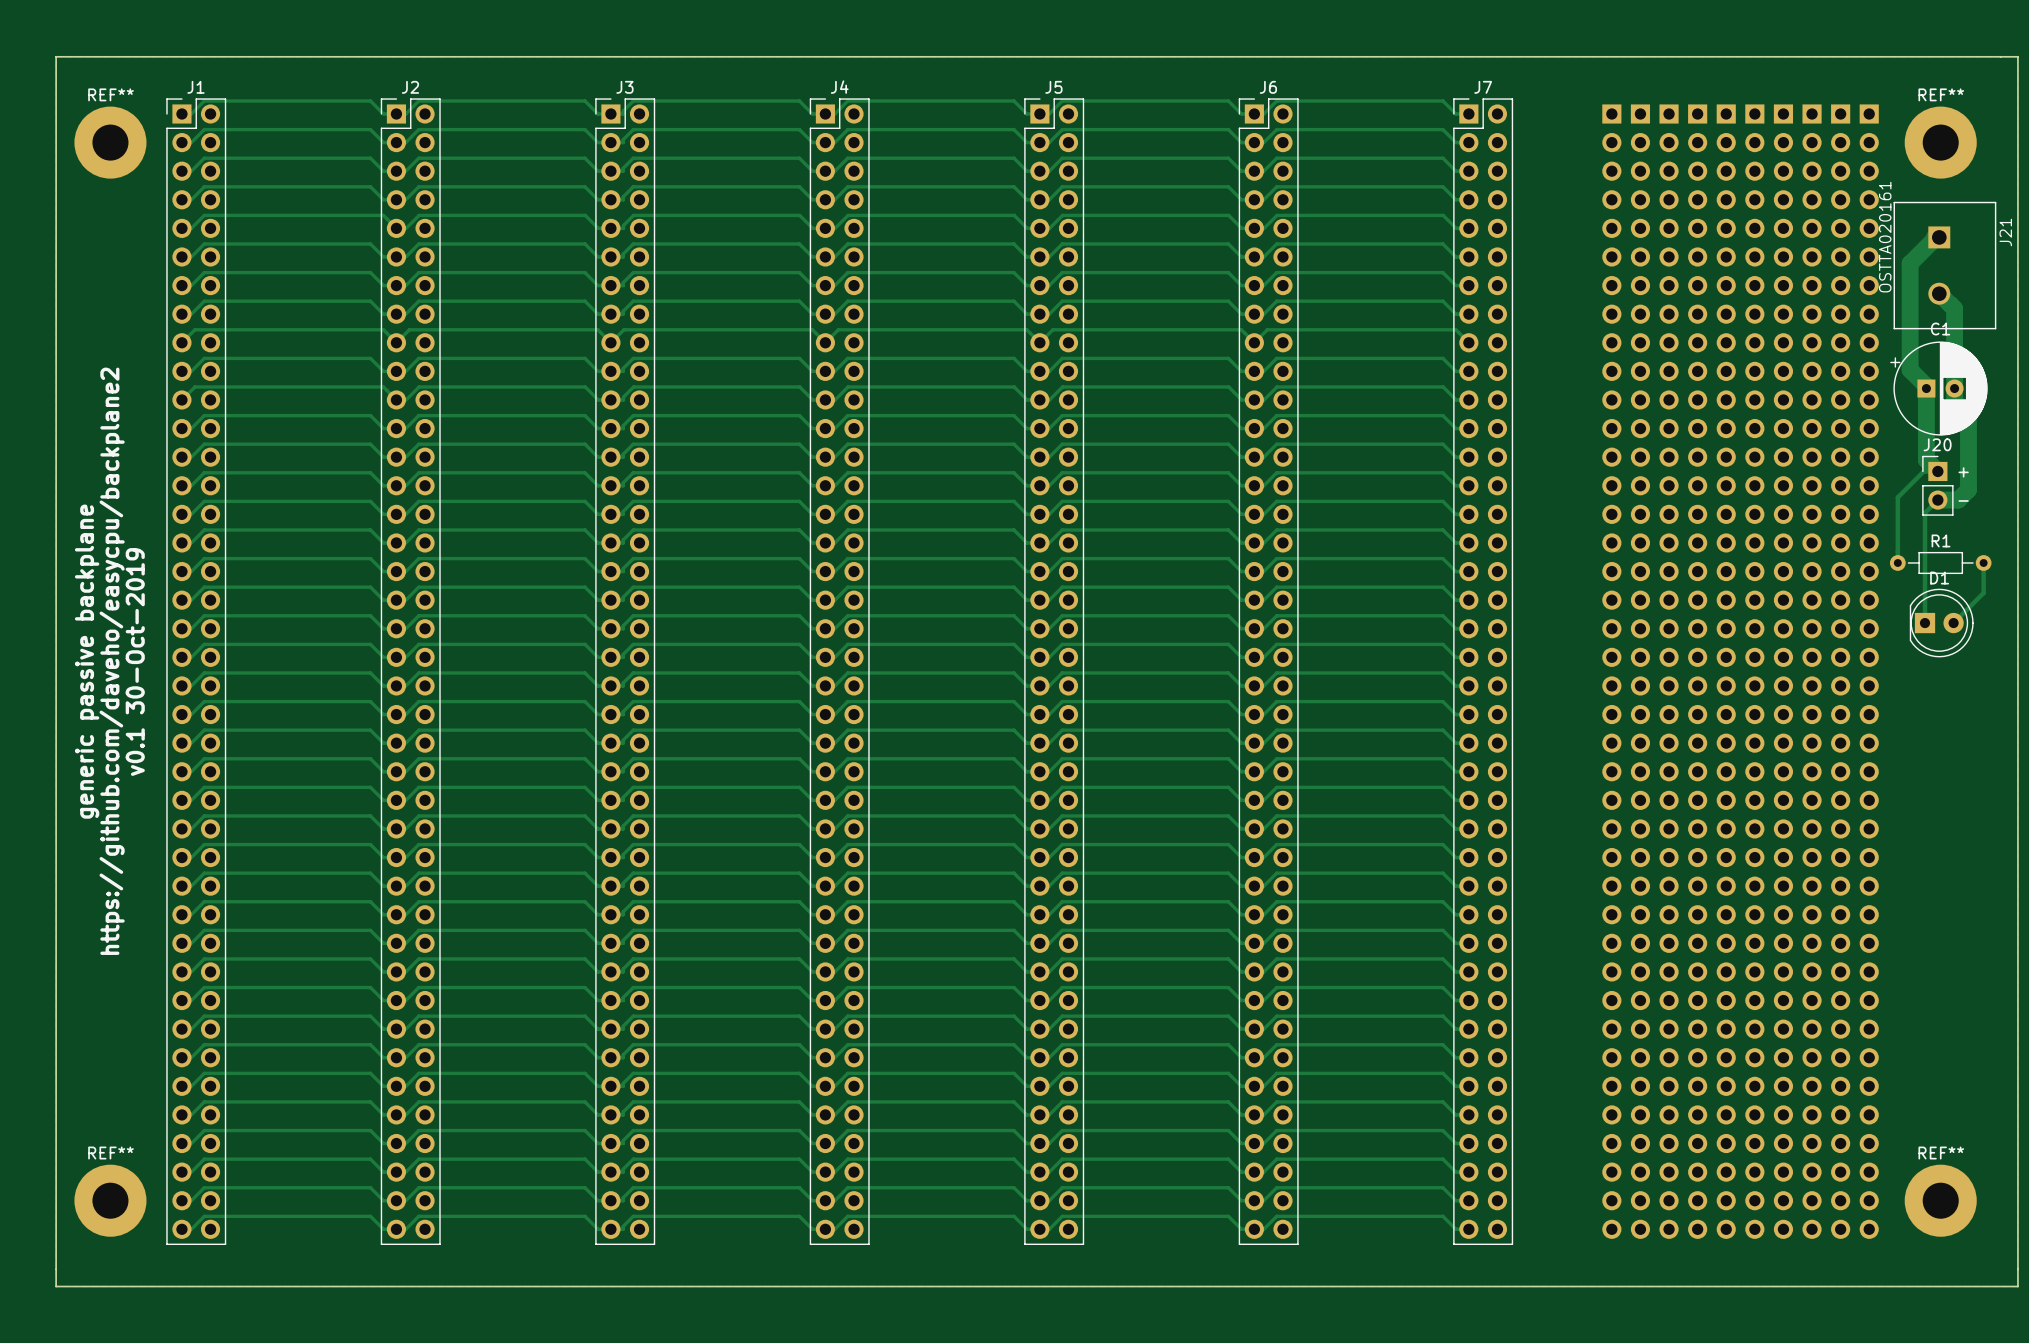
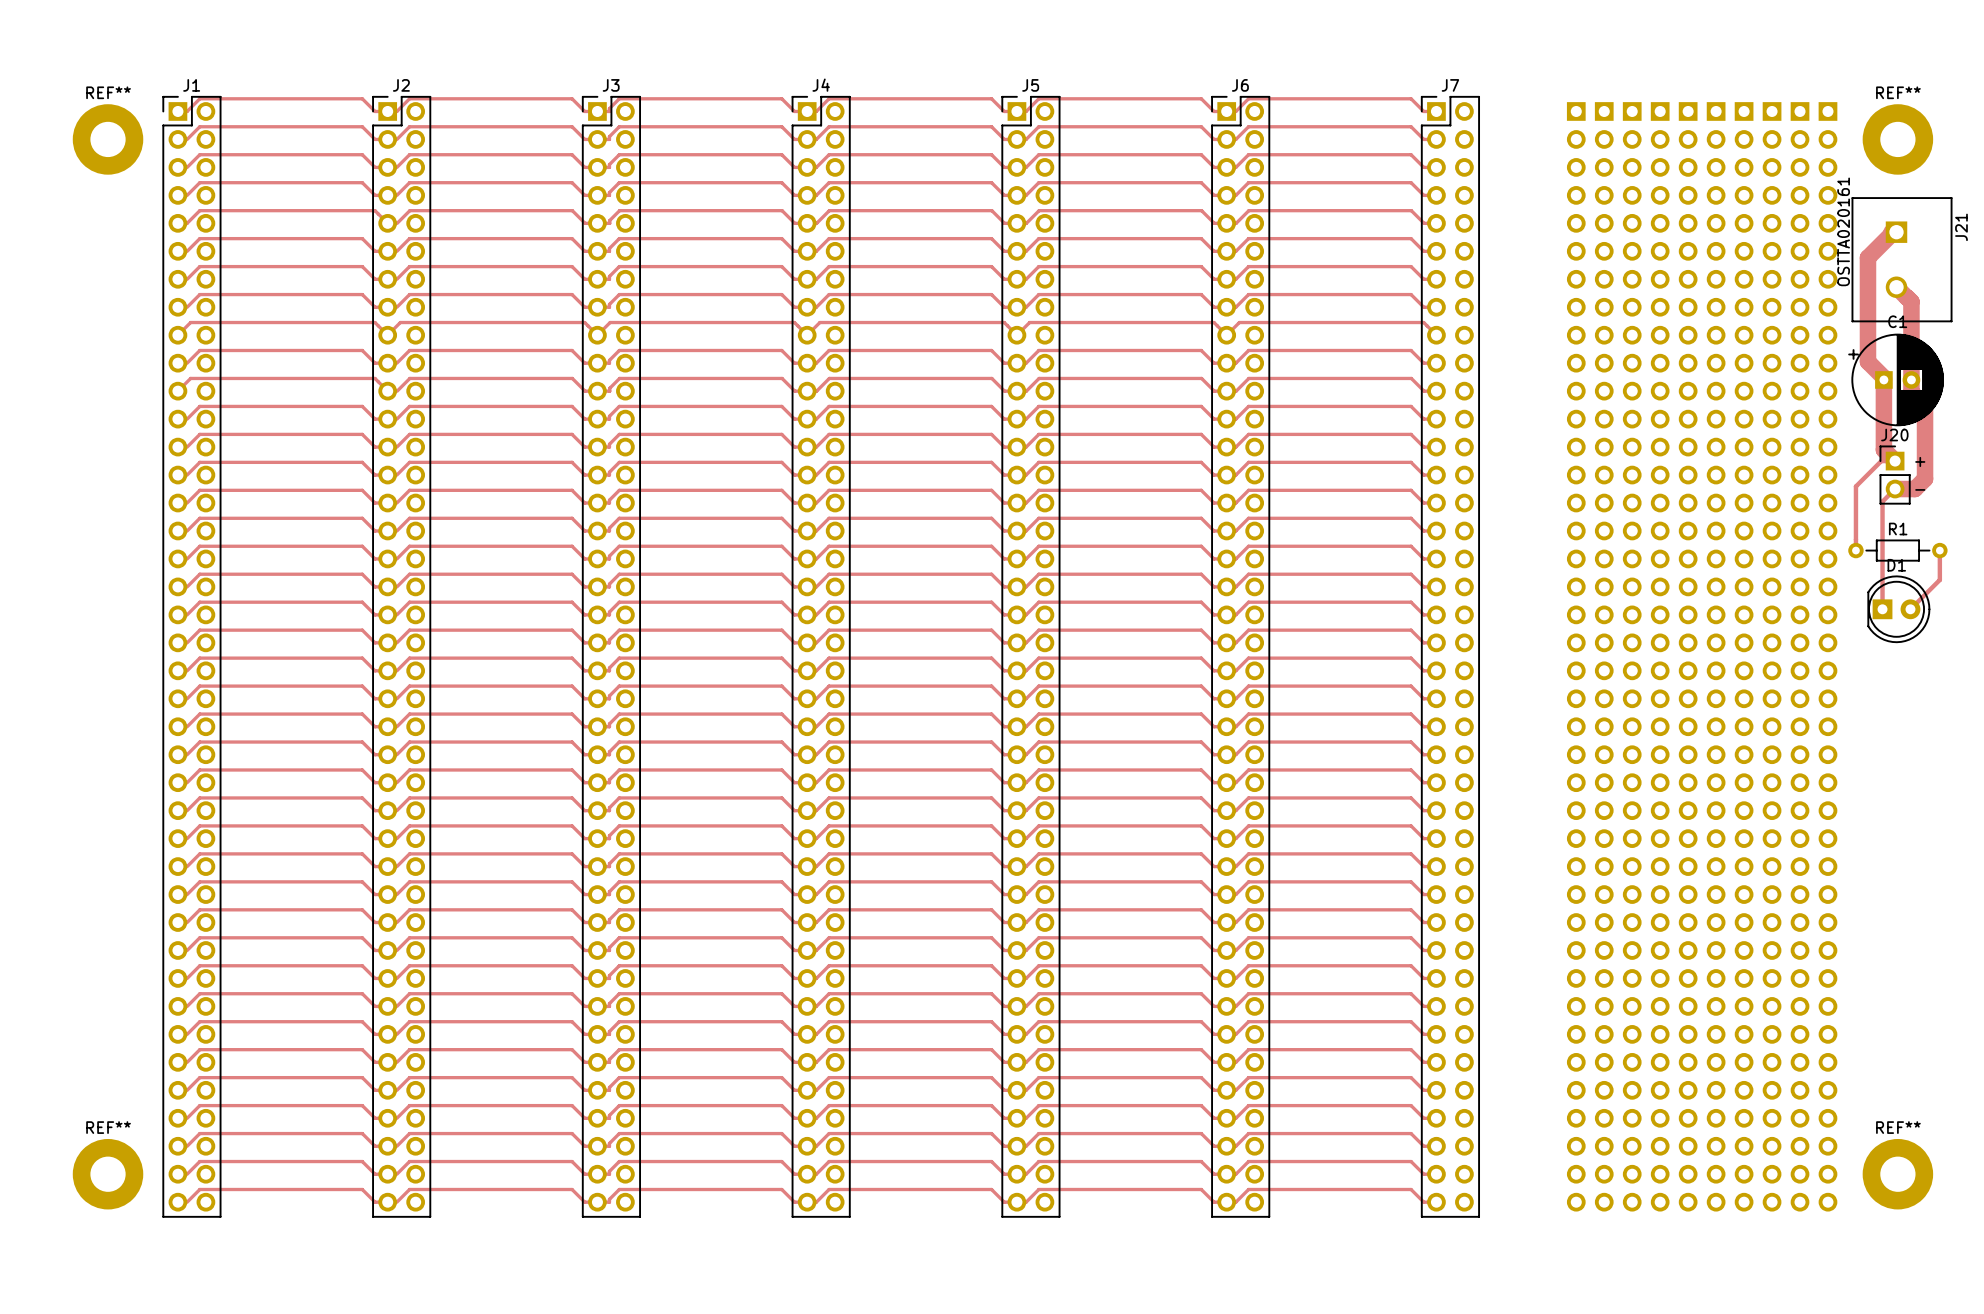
board edge: (56, 56) (56, 1286) (2017, 1286) (2017, 56) (56, 56) -> none
text: generic passive backplane (87, 661) -> none
text: https://github.com/daveho/easycpu/backplane2 (112, 661) -> none
text: v0.1 30-Oct-2019 (135, 662) -> none

